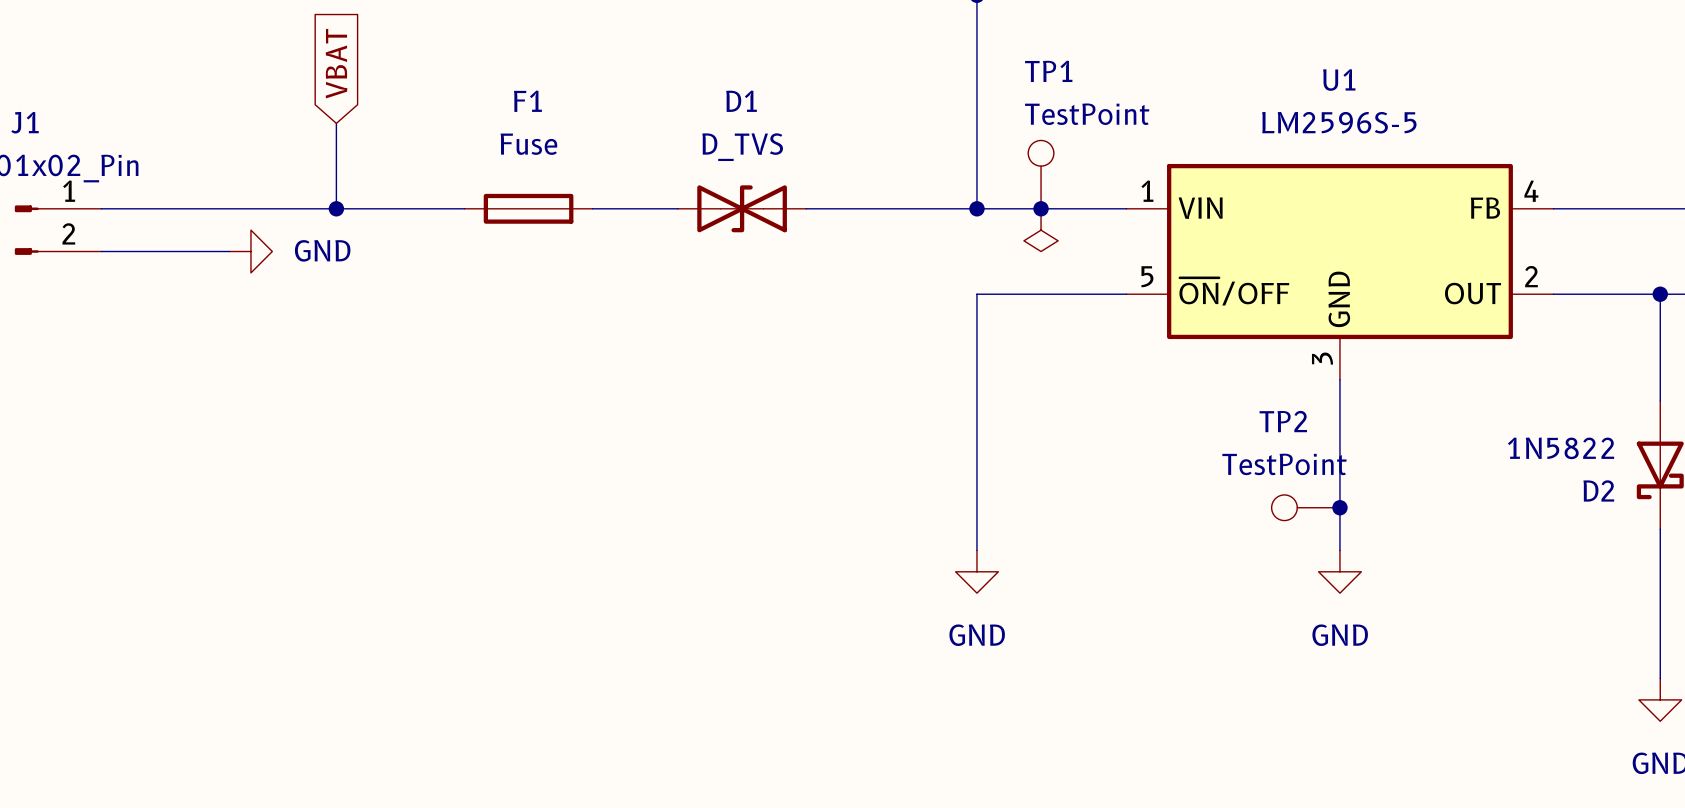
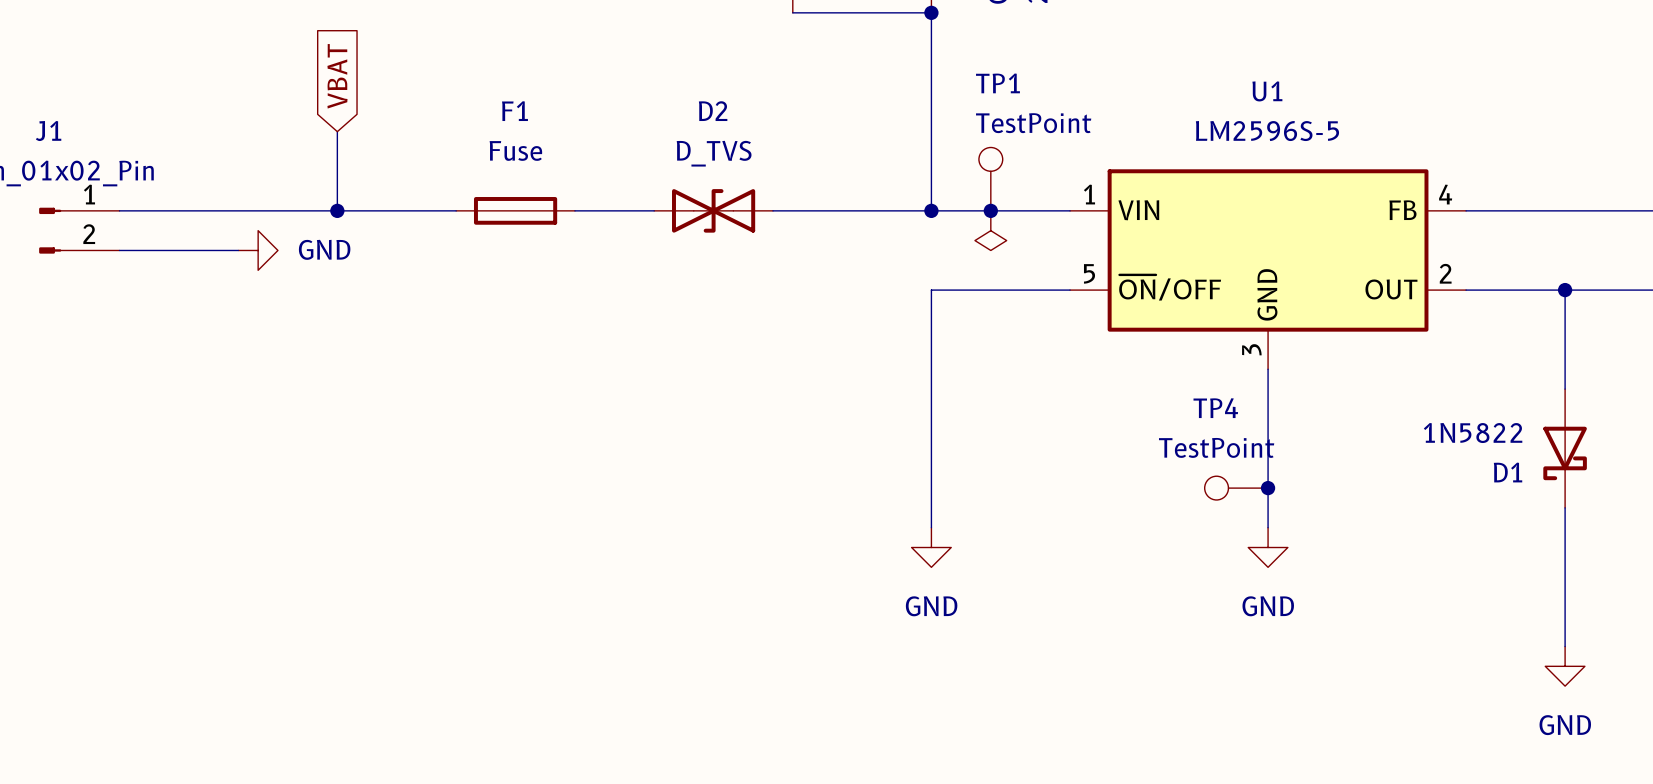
D1 name: D1 (741, 101) -> D2 (713, 111)
TP2 name: TP2 (1283, 421) -> TP4 (1215, 408)
D2 name: D2 (1598, 490) -> D1 (1508, 472)

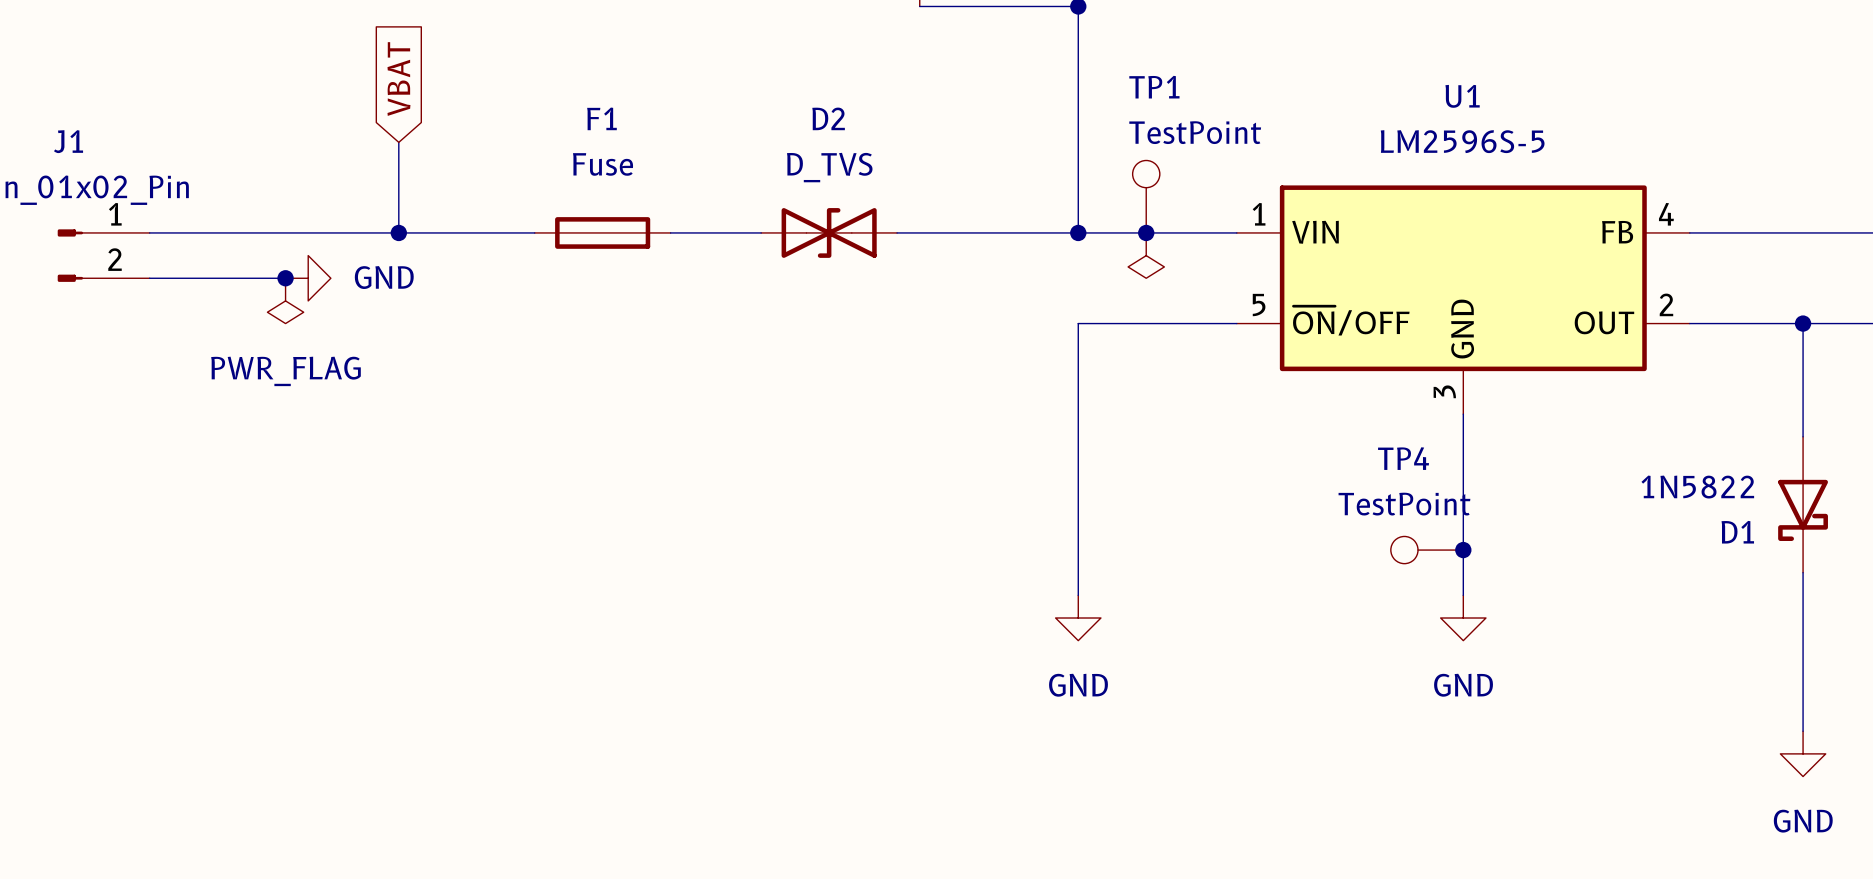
junction: none -> (285, 278)
power symbol: none -> PWR_FLAG (285, 300)

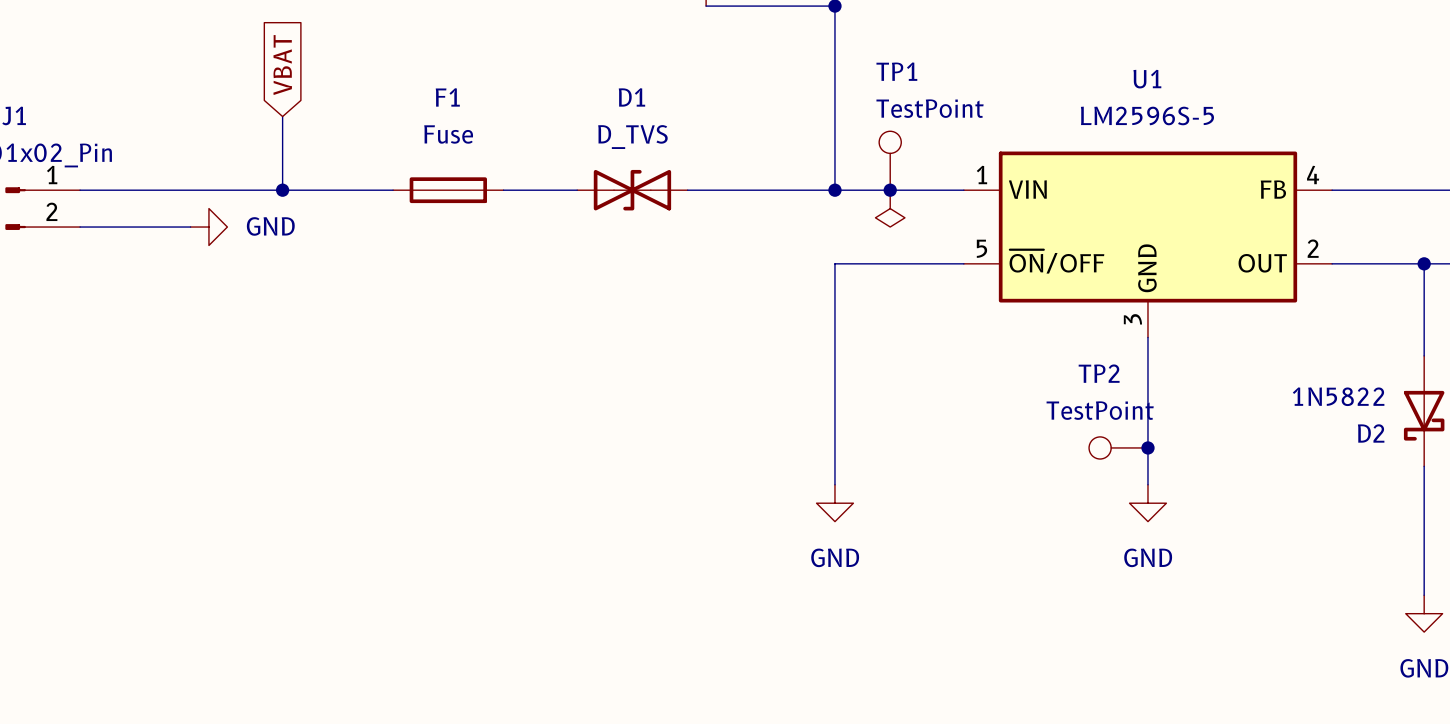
D2 name: D2 (828, 118) -> D1 (631, 97)
junction: (285, 278) -> none
power symbol: PWR_FLAG (285, 300) -> none
TP4 name: TP4 (1403, 458) -> TP2 (1099, 373)
D1 name: D1 (1737, 532) -> D2 (1371, 433)

